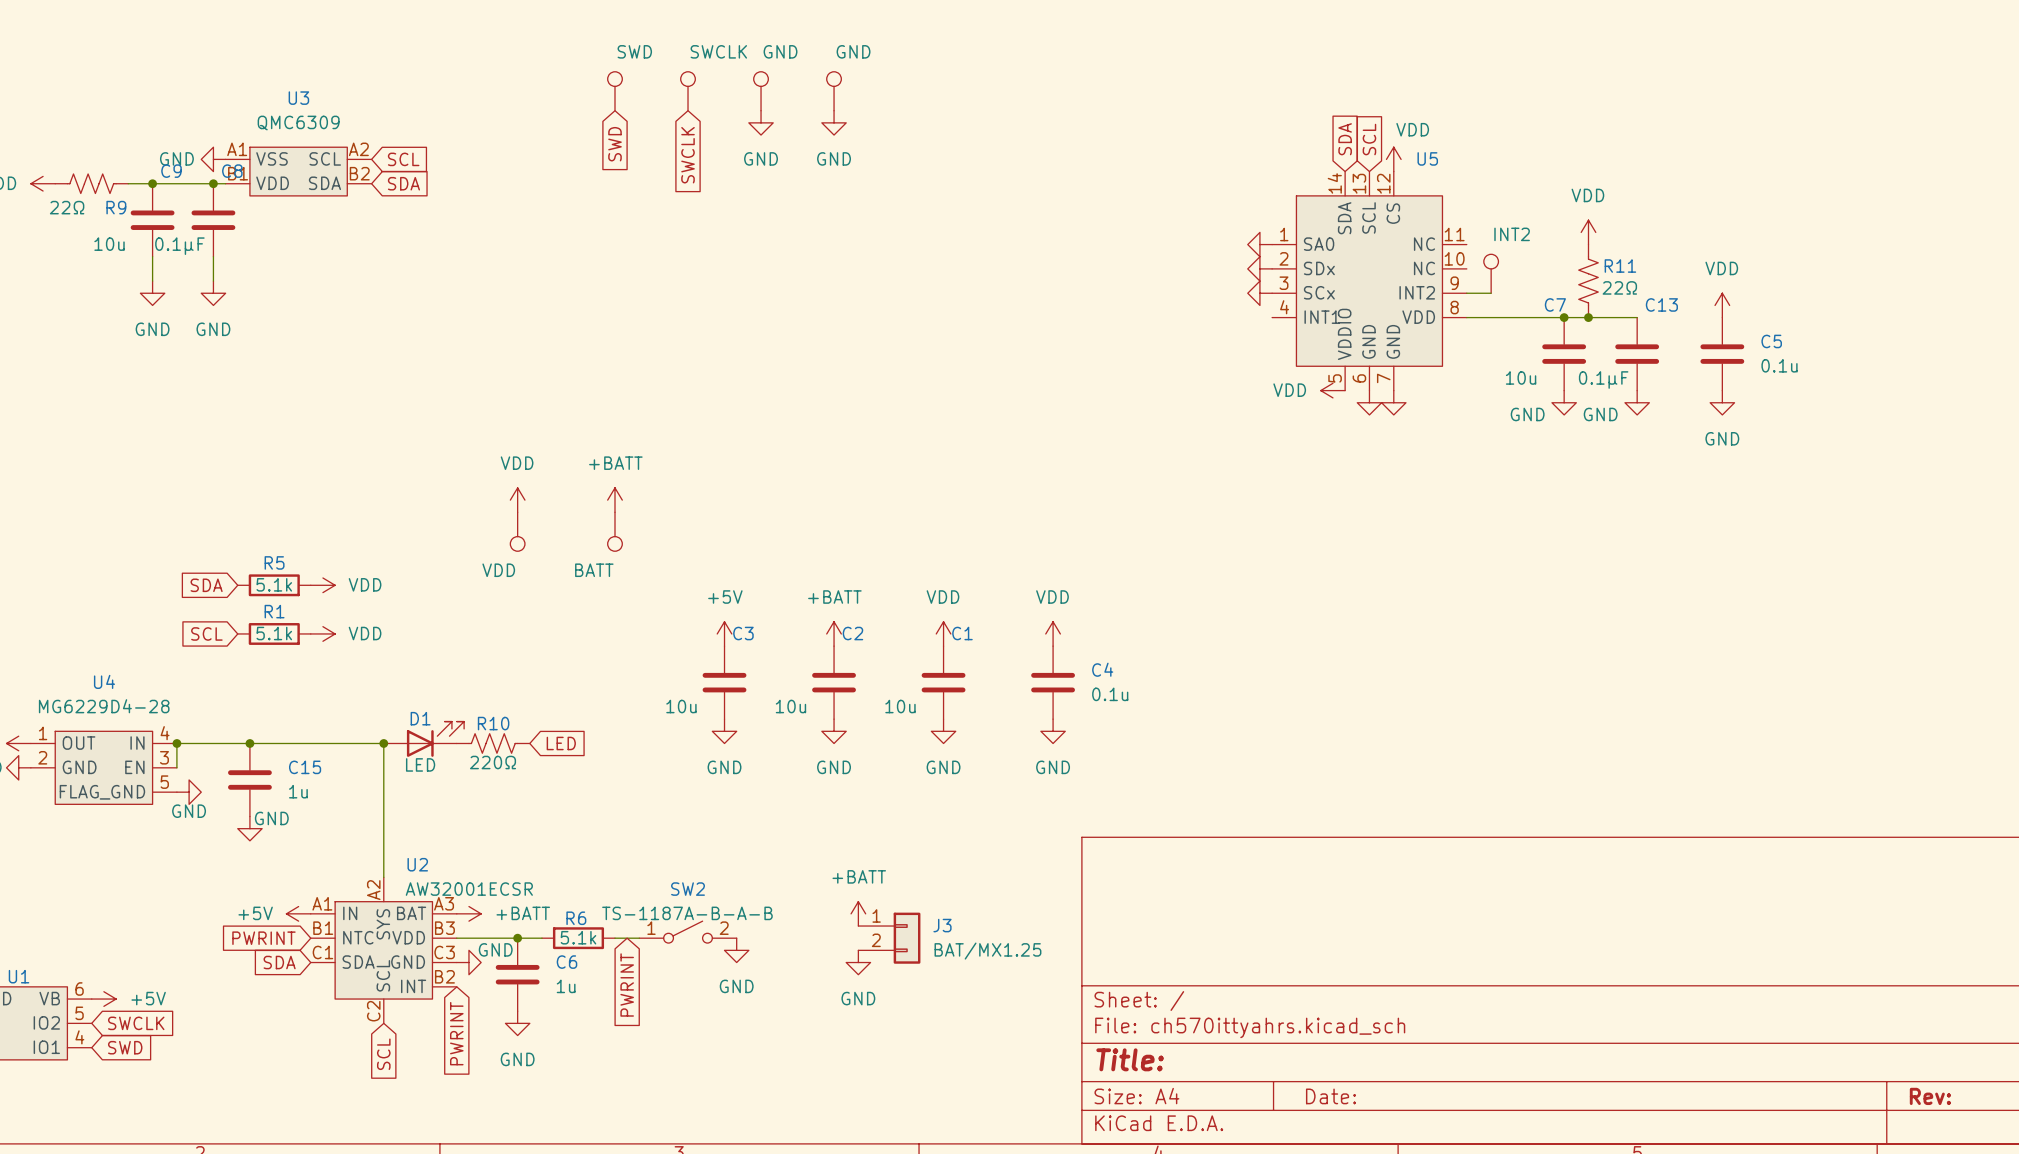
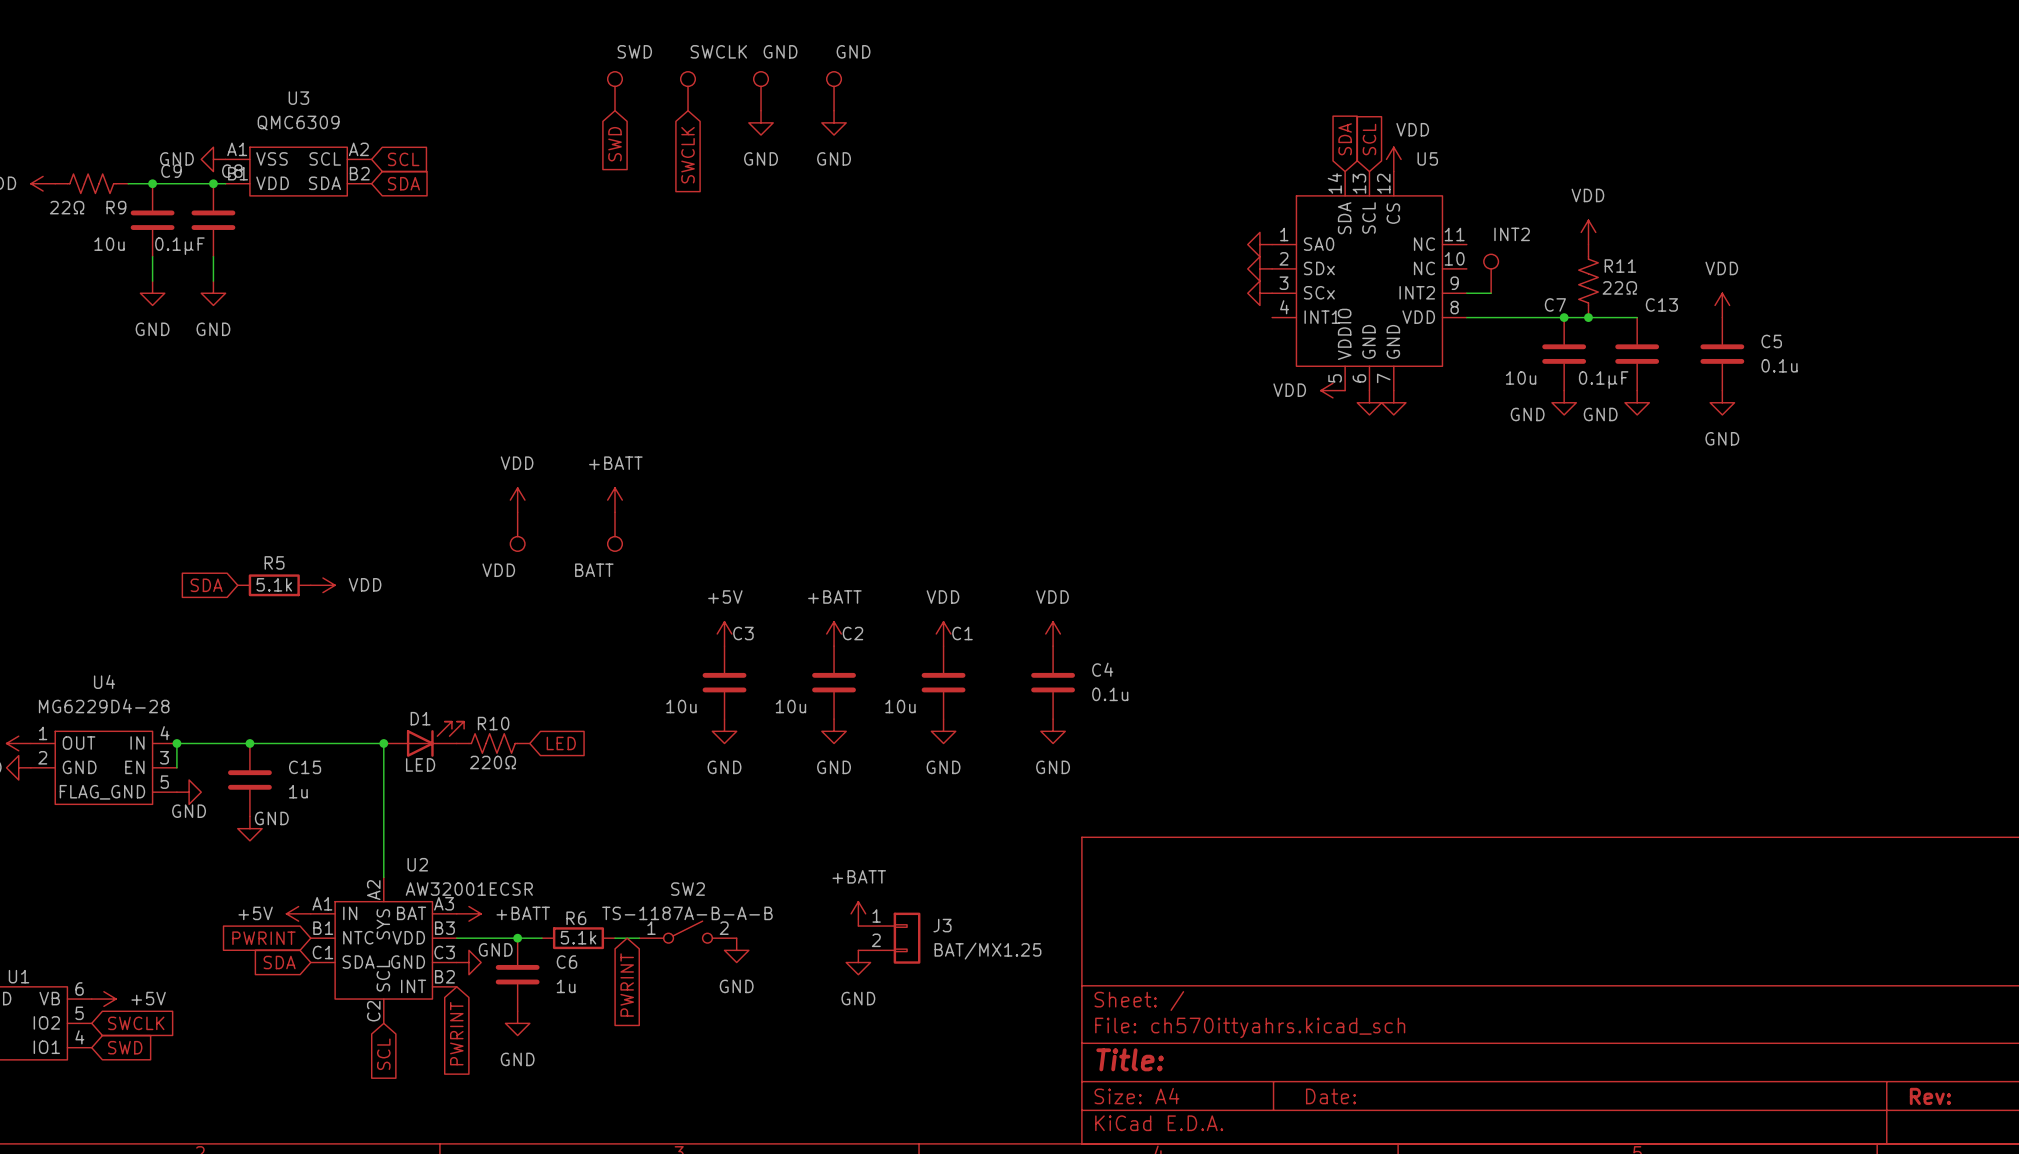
global label: SCL (206, 633) -> none
R1: 5.1k (274, 633) -> none
power symbol: VDD (322, 633) -> none

